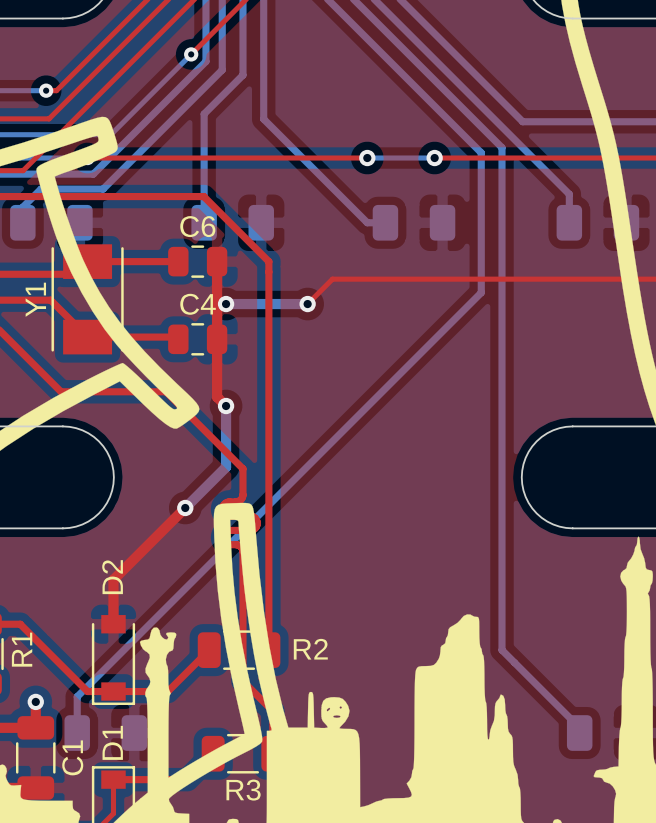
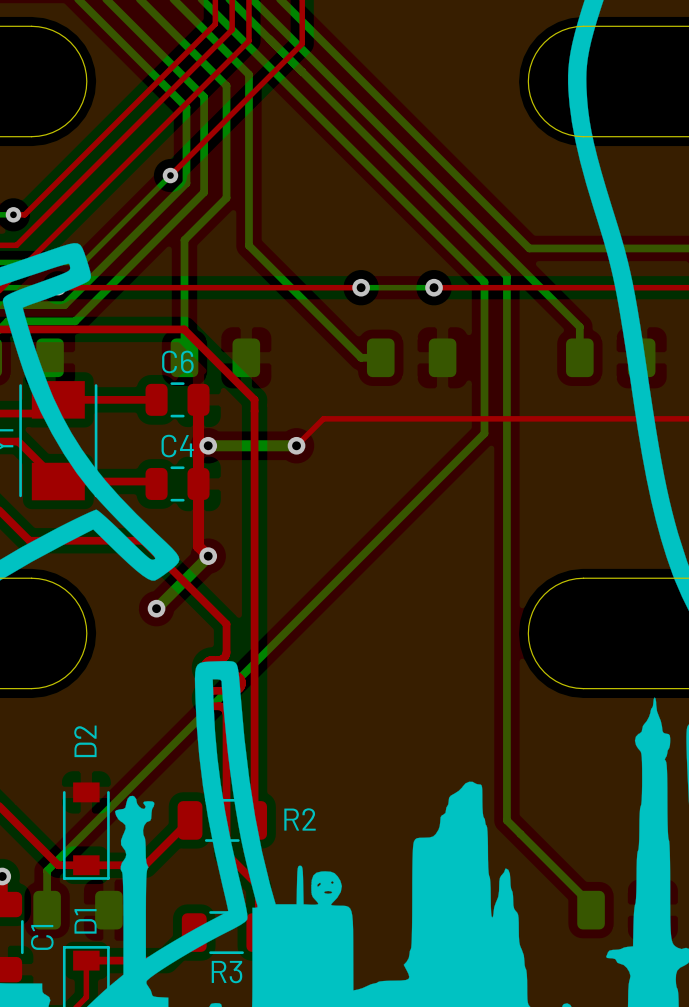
bottom track: (226, 406) (226, 467) (185, 507) -> (208, 556) (156, 608)
top track: (185, 507) (113, 579) (113, 624) -> none
via position: (185, 507) -> (156, 608)

